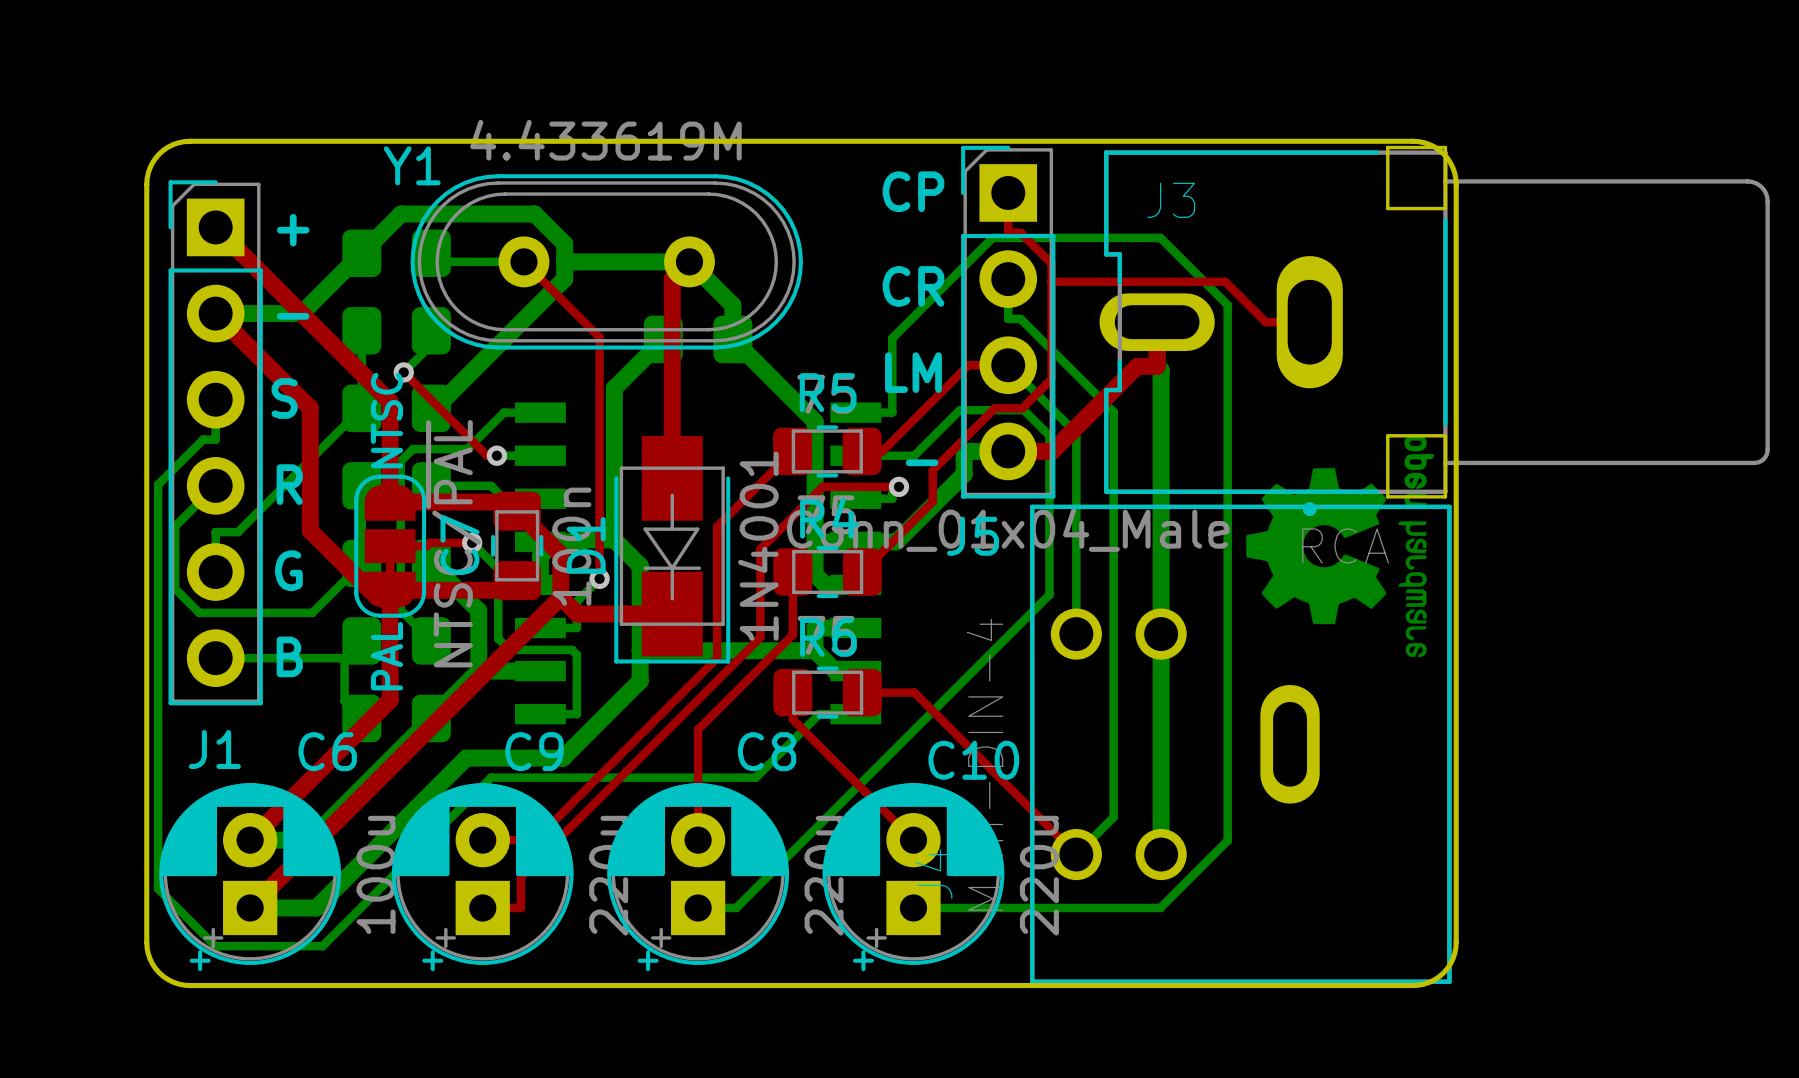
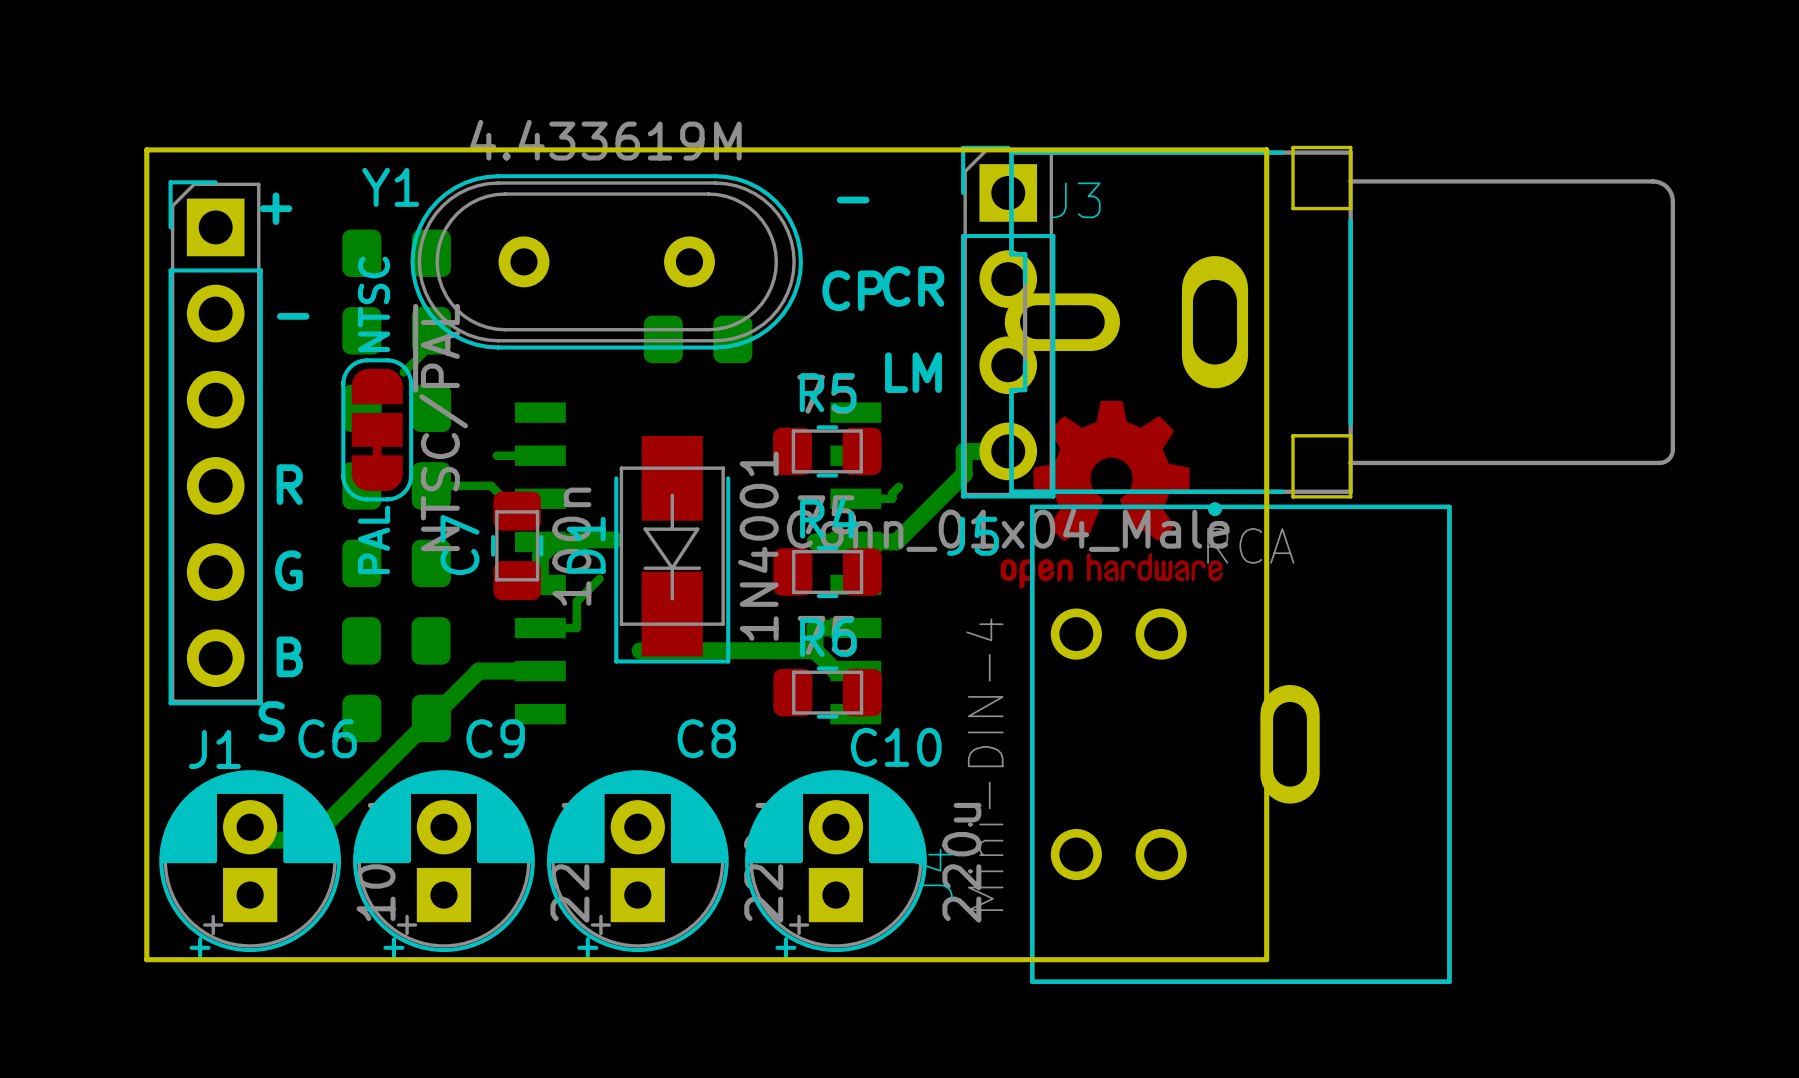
Y1 name position: Y1 (412, 165) -> Y1 (390, 187)
board edge: (146, 184) (150, 167) (159, 153) (173, 144) (189, 141) (1413, 141) (1429, 144) (1443, 153) (1452, 167) (1456, 184) (1456, 942) (1450, 963) (1434, 979) (1413, 985) (189, 985) (173, 982) (159, 972) (150, 958) (146, 942) -> (146, 184) (146, 149) (1266, 149) (1266, 959) (146, 959) (146, 942)
text position: CP (913, 191) -> CP (853, 290)
top track: (1008, 192) (1008, 232) (1020, 232) (1051, 263) (1051, 379) (1022, 408) (994, 408) (932, 470) (932, 501) (862, 572) -> none
top track: (215, 227) (390, 401) (390, 502) (508, 502) (560, 554) (560, 597) -> none
text position: + (293, 230) -> + (275, 208)
bottom track: (431, 253) (439, 261) (523, 261) -> none
top track: (523, 261) (599, 337) (599, 578) -> none
bottom track: (564, 261) (689, 261) (732, 305) (732, 339) (815, 421) (815, 574) (825, 584) (855, 584) -> none
top track: (689, 261) (672, 279) (672, 478) -> none
bottom track: (1008, 279) (1008, 318) (1020, 318) (1113, 411) (1113, 817) (1076, 854) -> none
top track: (1051, 281) (1225, 281) (1265, 322) (1309, 322) -> none
bottom track: (215, 313) (301, 313) (401, 214) (534, 214) (564, 243) (564, 278) (435, 408) (431, 408) -> none
top track: (215, 313) (310, 408) (310, 530) (369, 590) (507, 590) (517, 580) -> none
bottom track: (1157, 322) (1157, 366) (1161, 370) (1161, 854) -> none
top track: (1157, 322) (1157, 366) (1137, 366) (1052, 451) (1008, 451) -> none
bottom track: (361, 330) (361, 408) (238, 532) (215, 532) (215, 572) -> none
J3 position: (1434, 330) -> (1339, 330)
bottom track: (663, 339) (614, 388) (614, 539) (640, 565) (640, 680) (562, 758) (466, 758) (316, 907) (250, 907) -> none
bottom track: (1008, 365) (1076, 433) (1076, 634) -> none
top track: (1008, 365) (968, 365) (882, 451) (862, 451) -> none
top track: (403, 372) (487, 455) (496, 455) -> none
via: (403, 372) -> none
text position: S (284, 398) -> S (271, 721)
bottom track: (215, 399) (215, 439) (203, 439) (158, 484) (158, 888) (215, 946) (322, 946) (491, 777) (755, 777) (819, 714) (855, 714) -> none
drawing: none -> [1000, 400, 1223, 589]
bottom track: (540, 412) (503, 412) (467, 449) (412, 449) (400, 461) (400, 610) (431, 640) -> none
bottom track: (855, 412) (892, 412) (892, 338) (992, 237) (1160, 237) (1227, 305) (1227, 840) (1160, 907) (913, 907) -> none
text position: NTSC (386, 420) -> NTSC (374, 304)
drawing: [1246, 435, 1435, 658] -> none
top track: (792, 451) (717, 526) (717, 658) (535, 840) (482, 840) -> none
via: (496, 455) -> none
bottom track: (855, 455) (914, 455) (959, 410) (1023, 410) (1049, 435) (1049, 594) (736, 907) (698, 907) -> none
text position: - (922, 462) -> - (853, 200)
bottom track: (215, 485) (175, 526) (175, 588) (199, 612) (312, 612) (361, 563) (361, 485) -> none
top track: (898, 486) (822, 486) (760, 549) (760, 637) (520, 877) (520, 907) (482, 907) -> none
via: (898, 486) -> none
bottom track: (472, 542) (498, 568) (498, 638) (509, 649) (572, 649) (576, 654) (576, 714) (540, 714) -> none
top track: (472, 542) (429, 542) (426, 546) (390, 546) -> none
via: (472, 542) -> none
part position: (390, 546) -> (377, 429)
bottom track: (431, 563) (478, 610) (478, 671) -> none
top track: (792, 572) (792, 634) (698, 729) (698, 840) -> none
via: (599, 578) -> none
top track: (390, 590) (390, 700) (250, 840) -> none
top track: (560, 597) (577, 614) (672, 614) -> none
top track: (560, 597) (250, 907) -> none
text position: PAL (386, 656) -> PAL (374, 539)
bottom track: (215, 658) (344, 658) -> none
bottom track: (344, 658) (344, 701) (361, 718) -> none
top track: (792, 692) (792, 719) (913, 840) -> none
top track: (862, 692) (914, 692) (1076, 854) -> none
C6 position: (250, 877) -> (250, 864)
C9 position: (482, 877) -> (443, 864)
C8 position: (698, 877) -> (637, 864)
C10 position: (913, 877) -> (835, 864)

